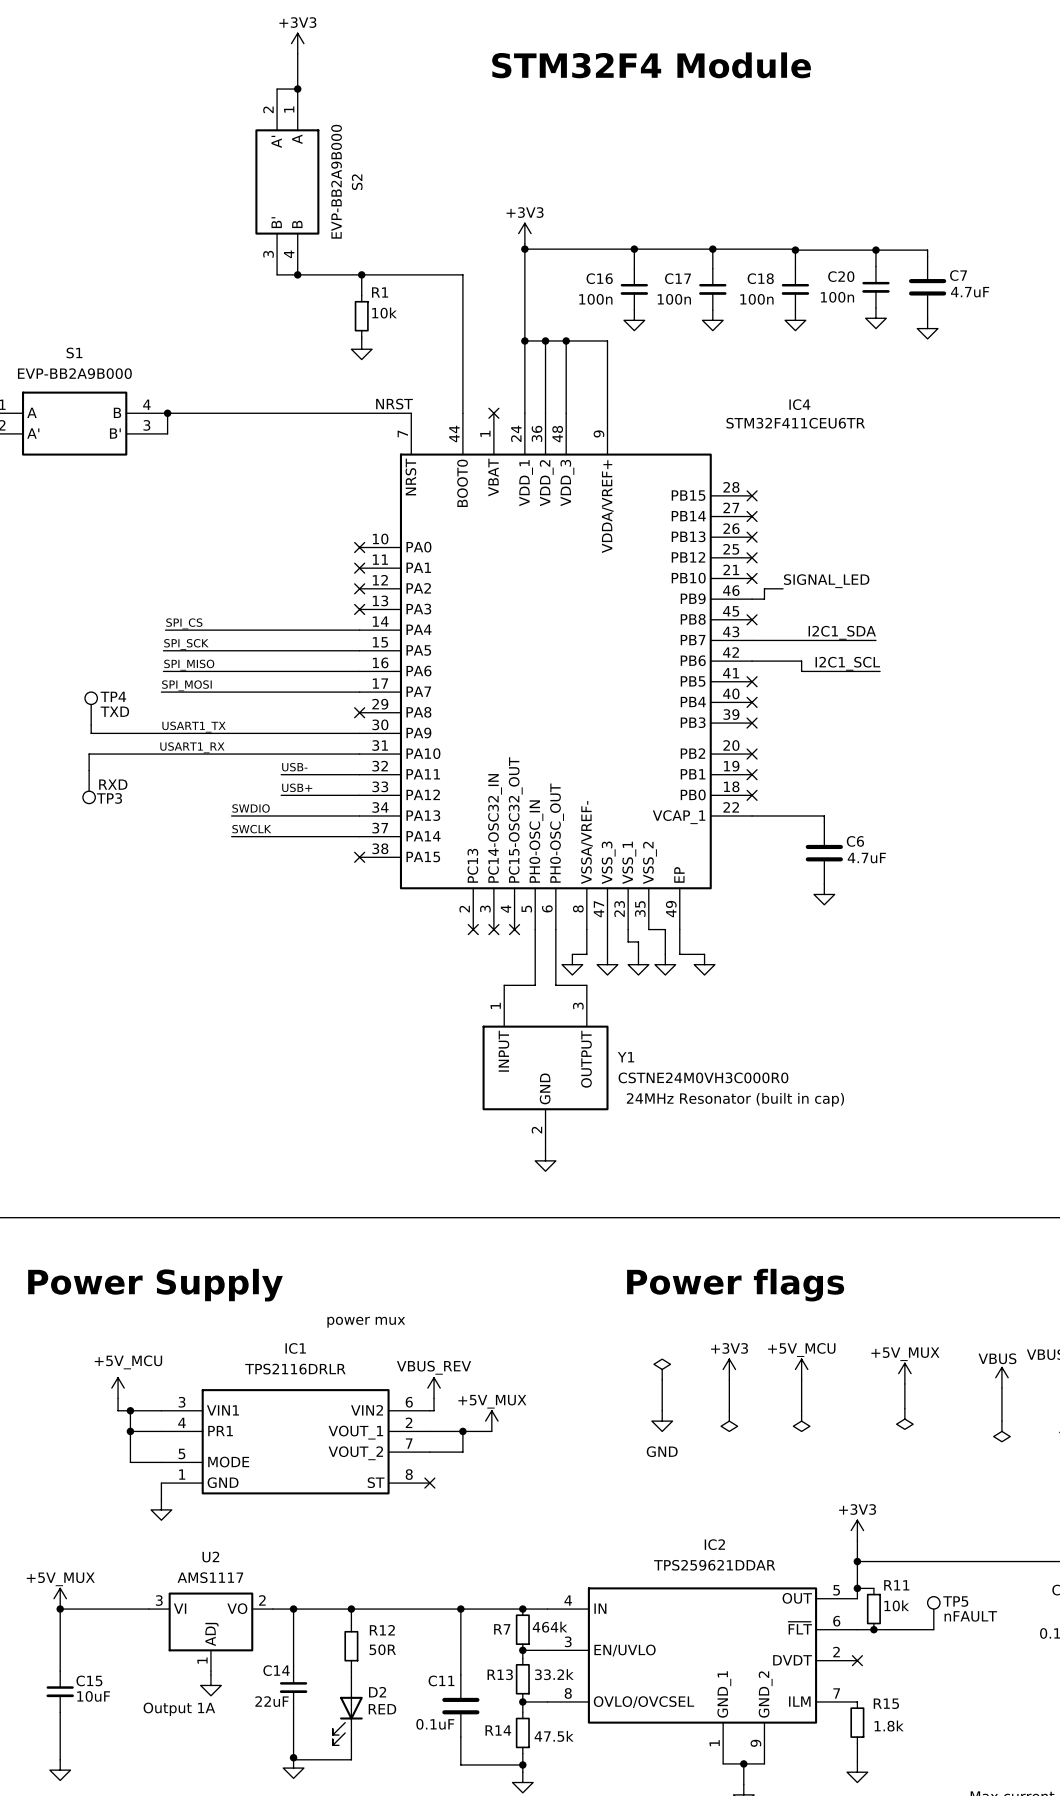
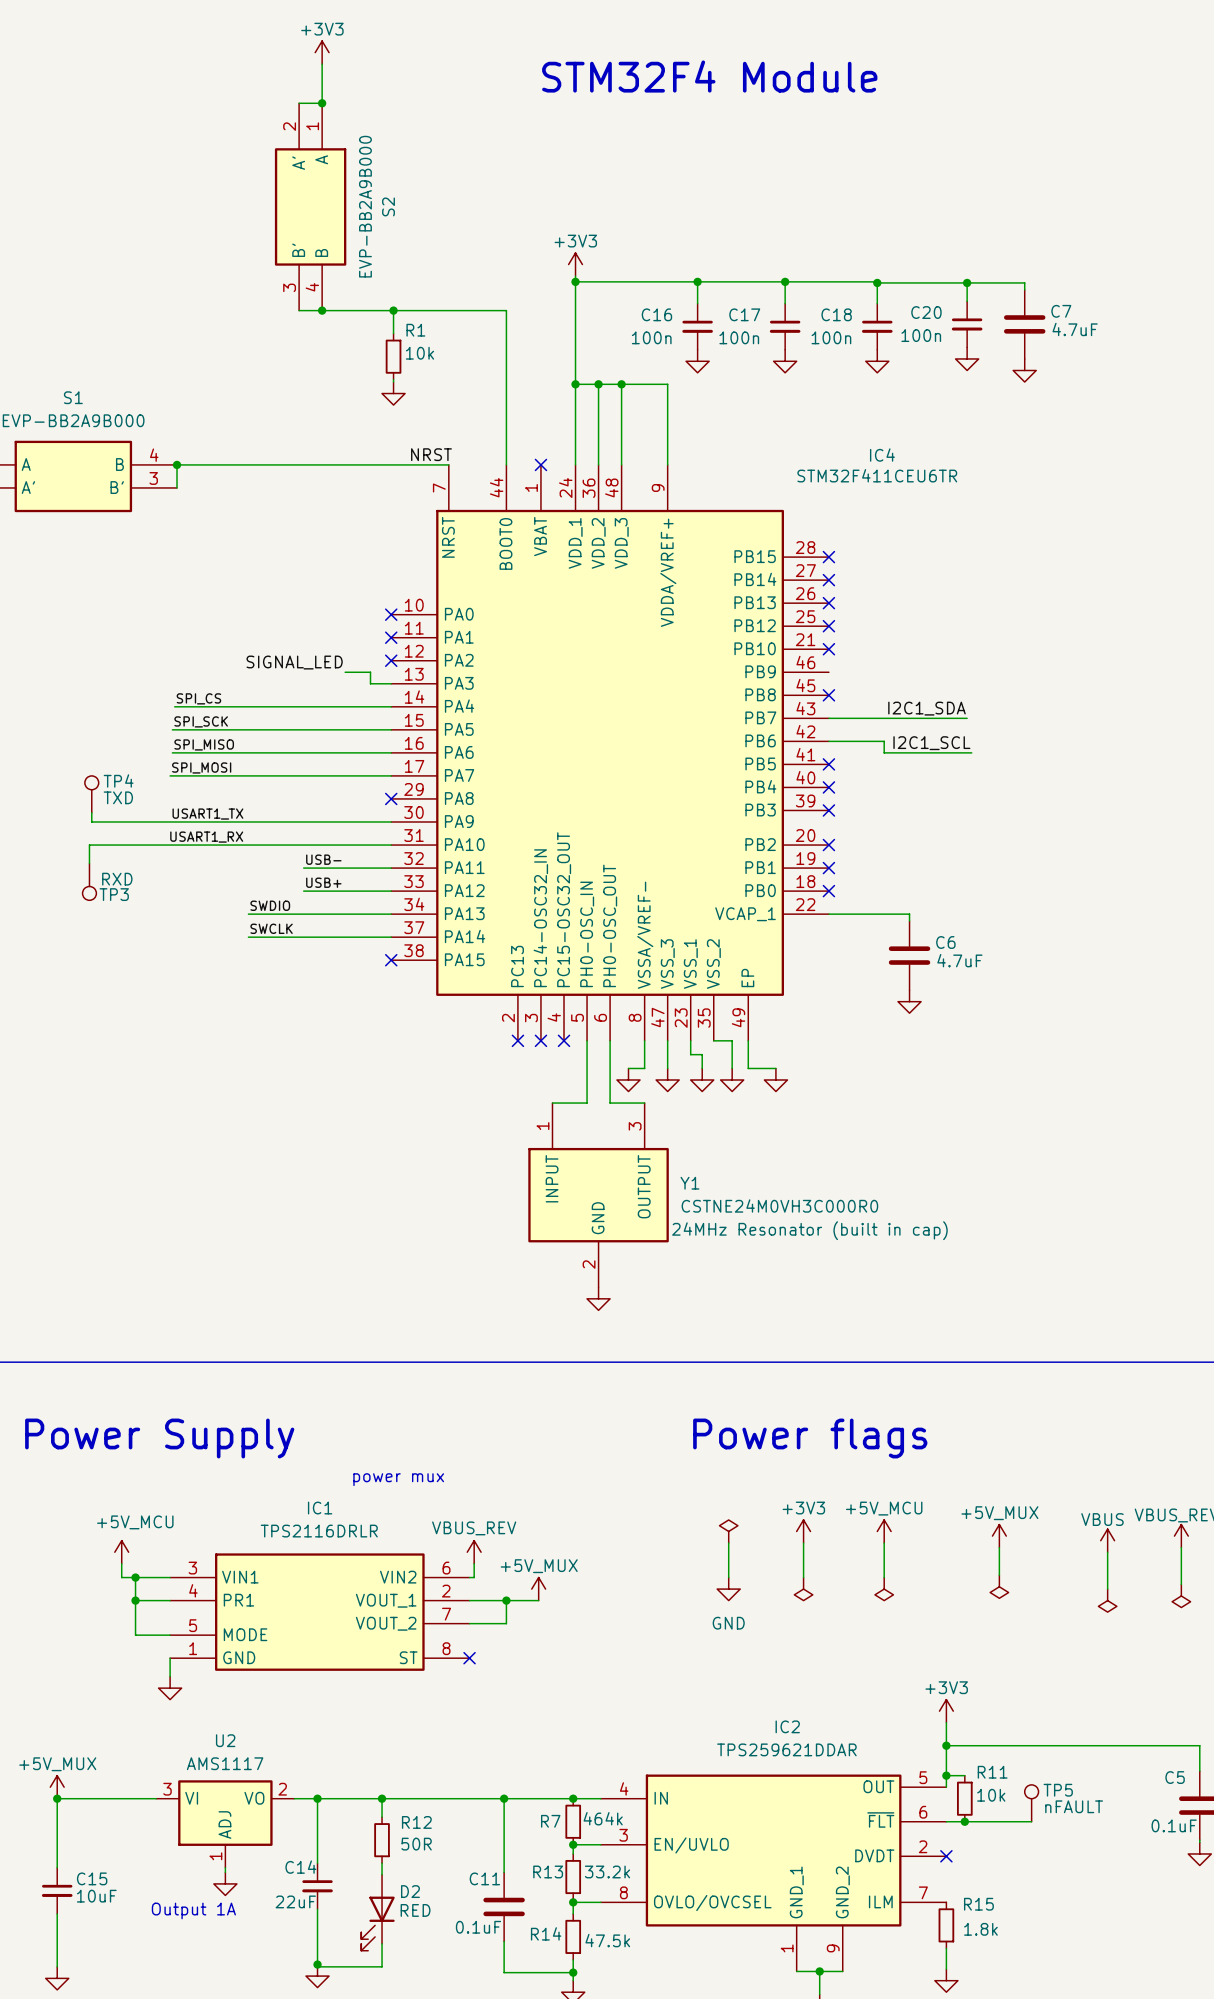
label: SIGNAL_LED (826, 581) -> none
wire: (783, 588) (764, 588) (764, 599) (752, 599) -> none
label: none -> SIGNAL_LED (294, 662)
wire: none -> (345, 672) (370, 672) (370, 683) (391, 683)
no-connect mark: (359, 609) -> none

